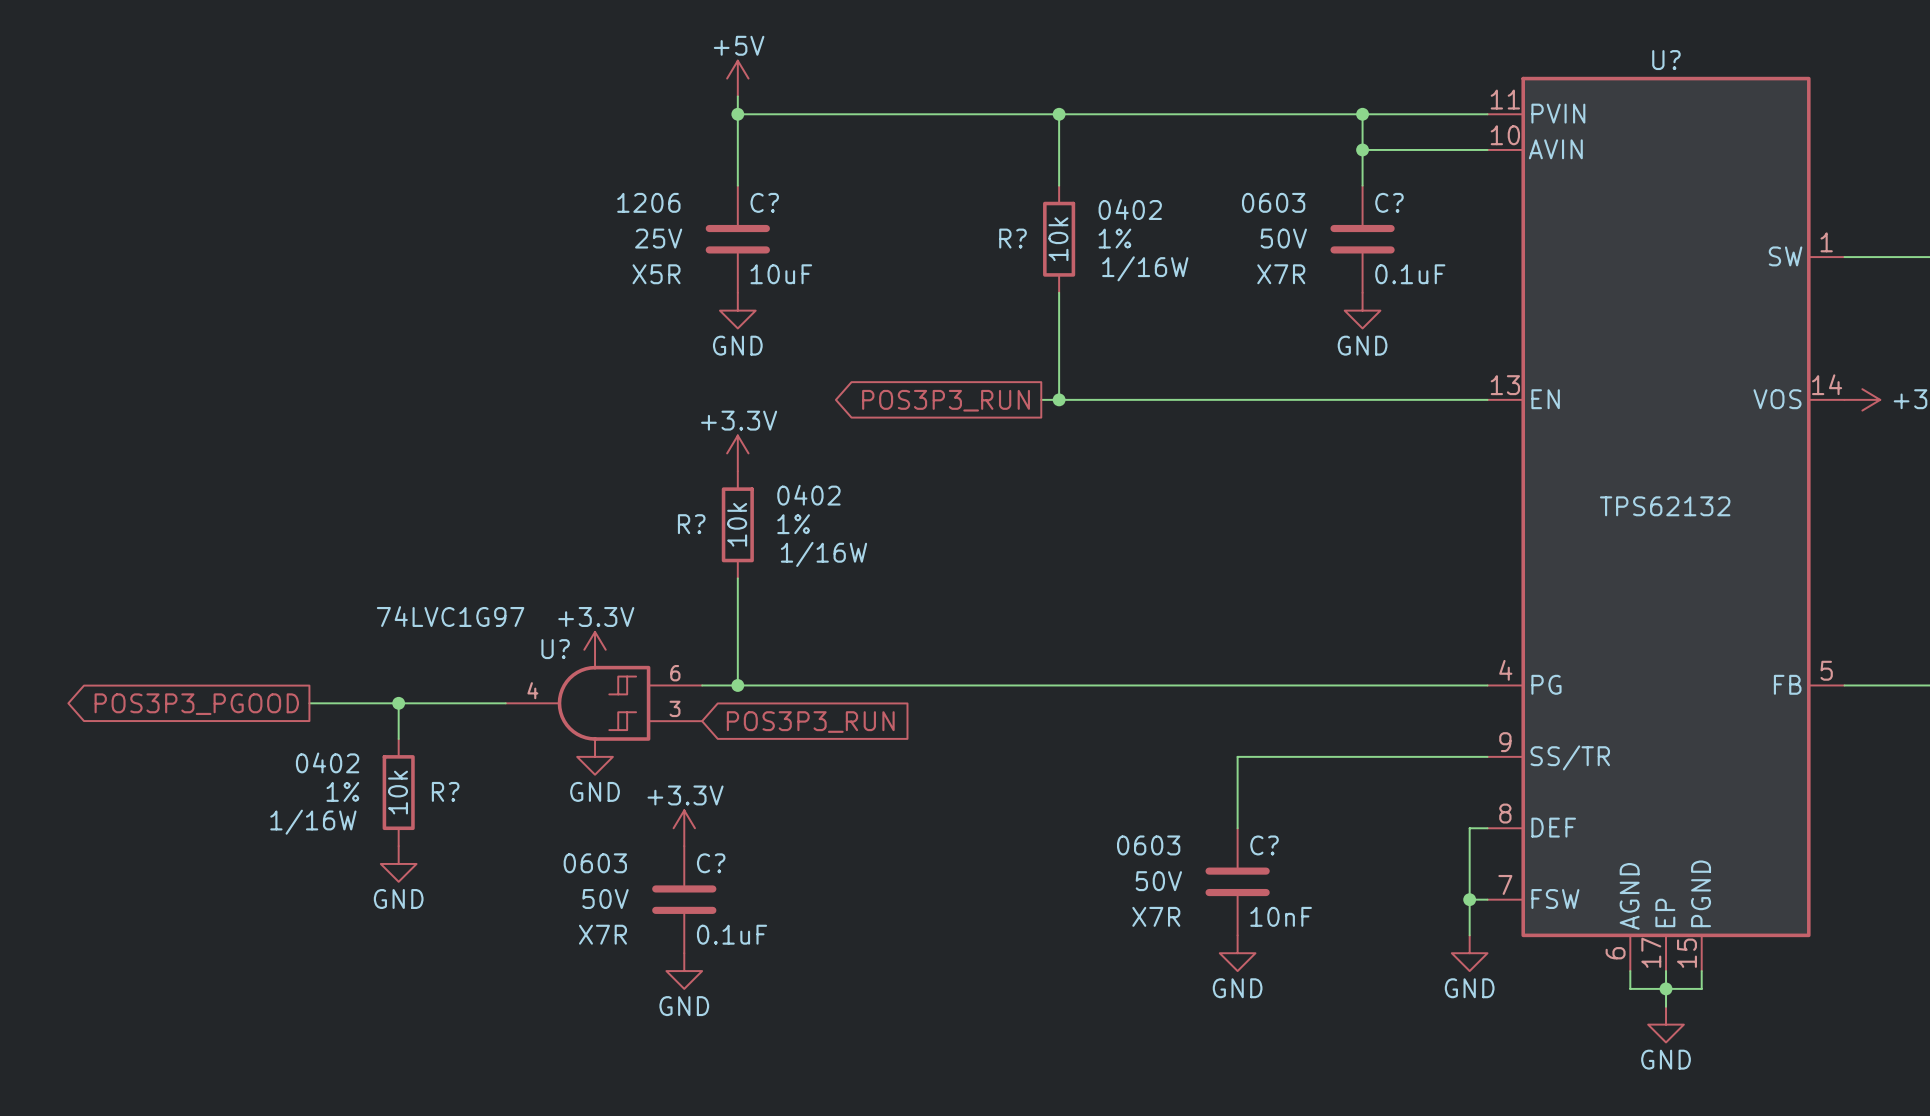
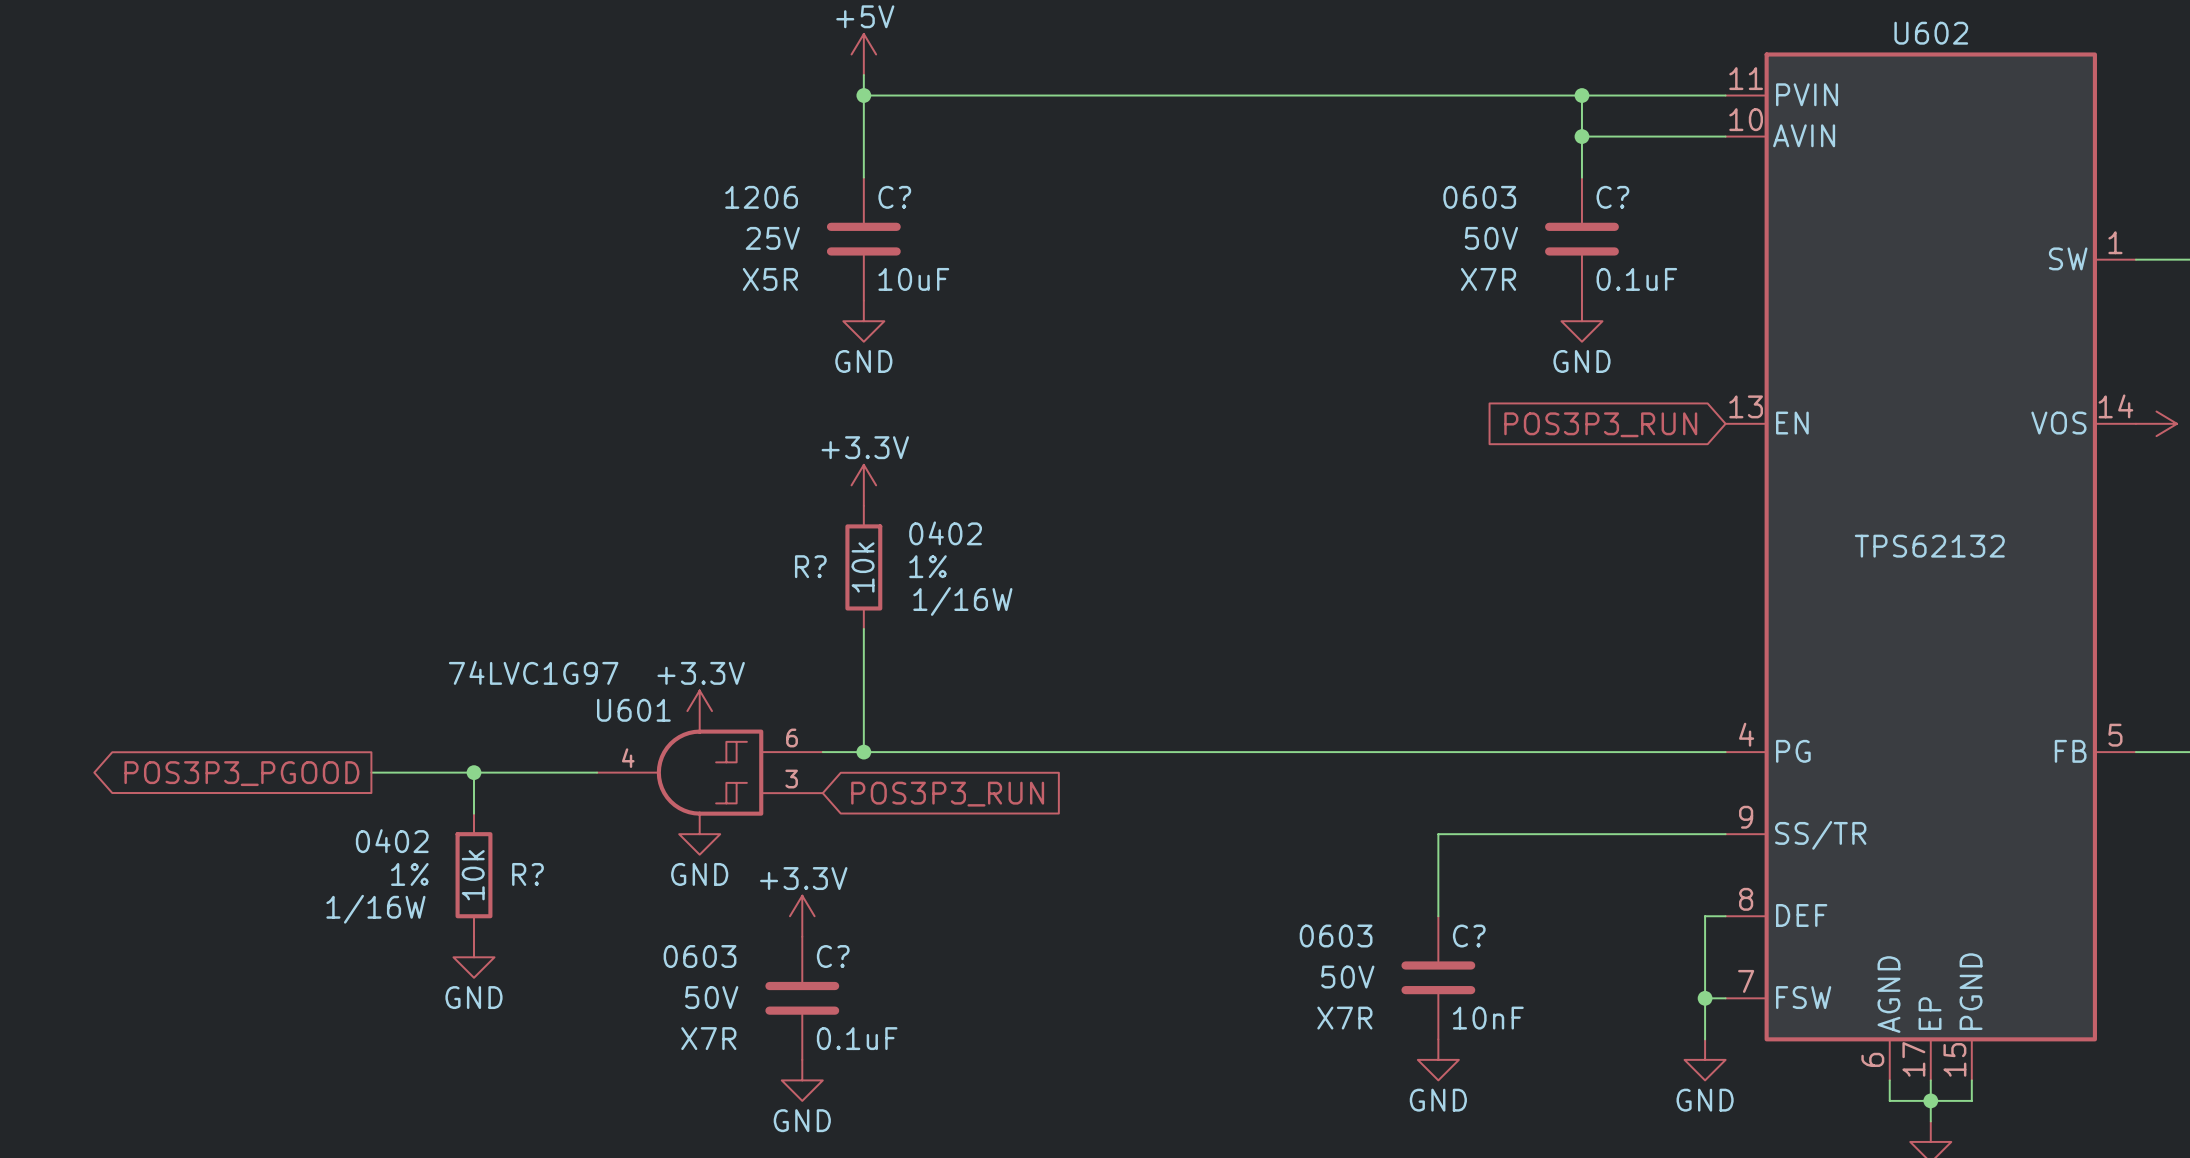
U? name: U? (1666, 60) -> U602 (1931, 33)
wire: (1059, 114) (1059, 185) -> none
junction: (1059, 114) -> none
R?: 10k (1059, 239) -> none
wire: (1059, 292) (1059, 399) -> none
wire: (1041, 399) (1487, 399) -> none
junction: (1059, 399) -> none
global label: POS3P3_RUN (946, 400) -> none
global label: none -> POS3P3_RUN (1600, 424)
U? name: U? (555, 649) -> U601 (633, 710)

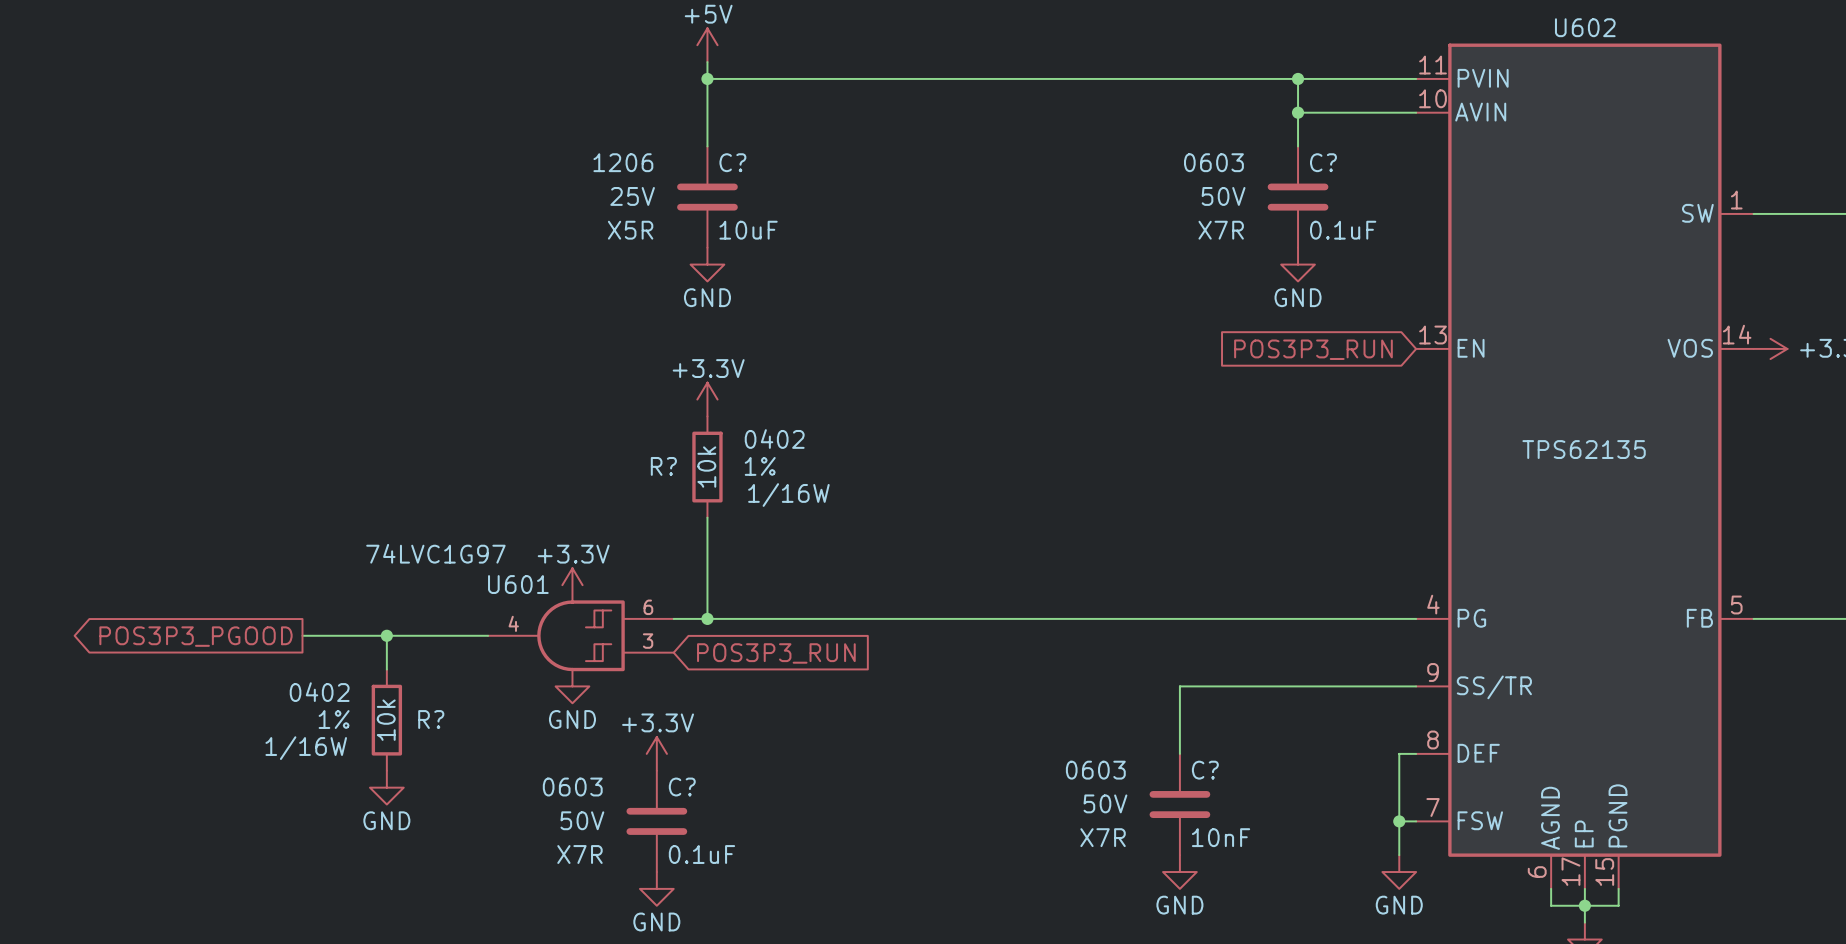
U602 value: TPS62132 (1929, 546) -> TPS62135 (1584, 449)

